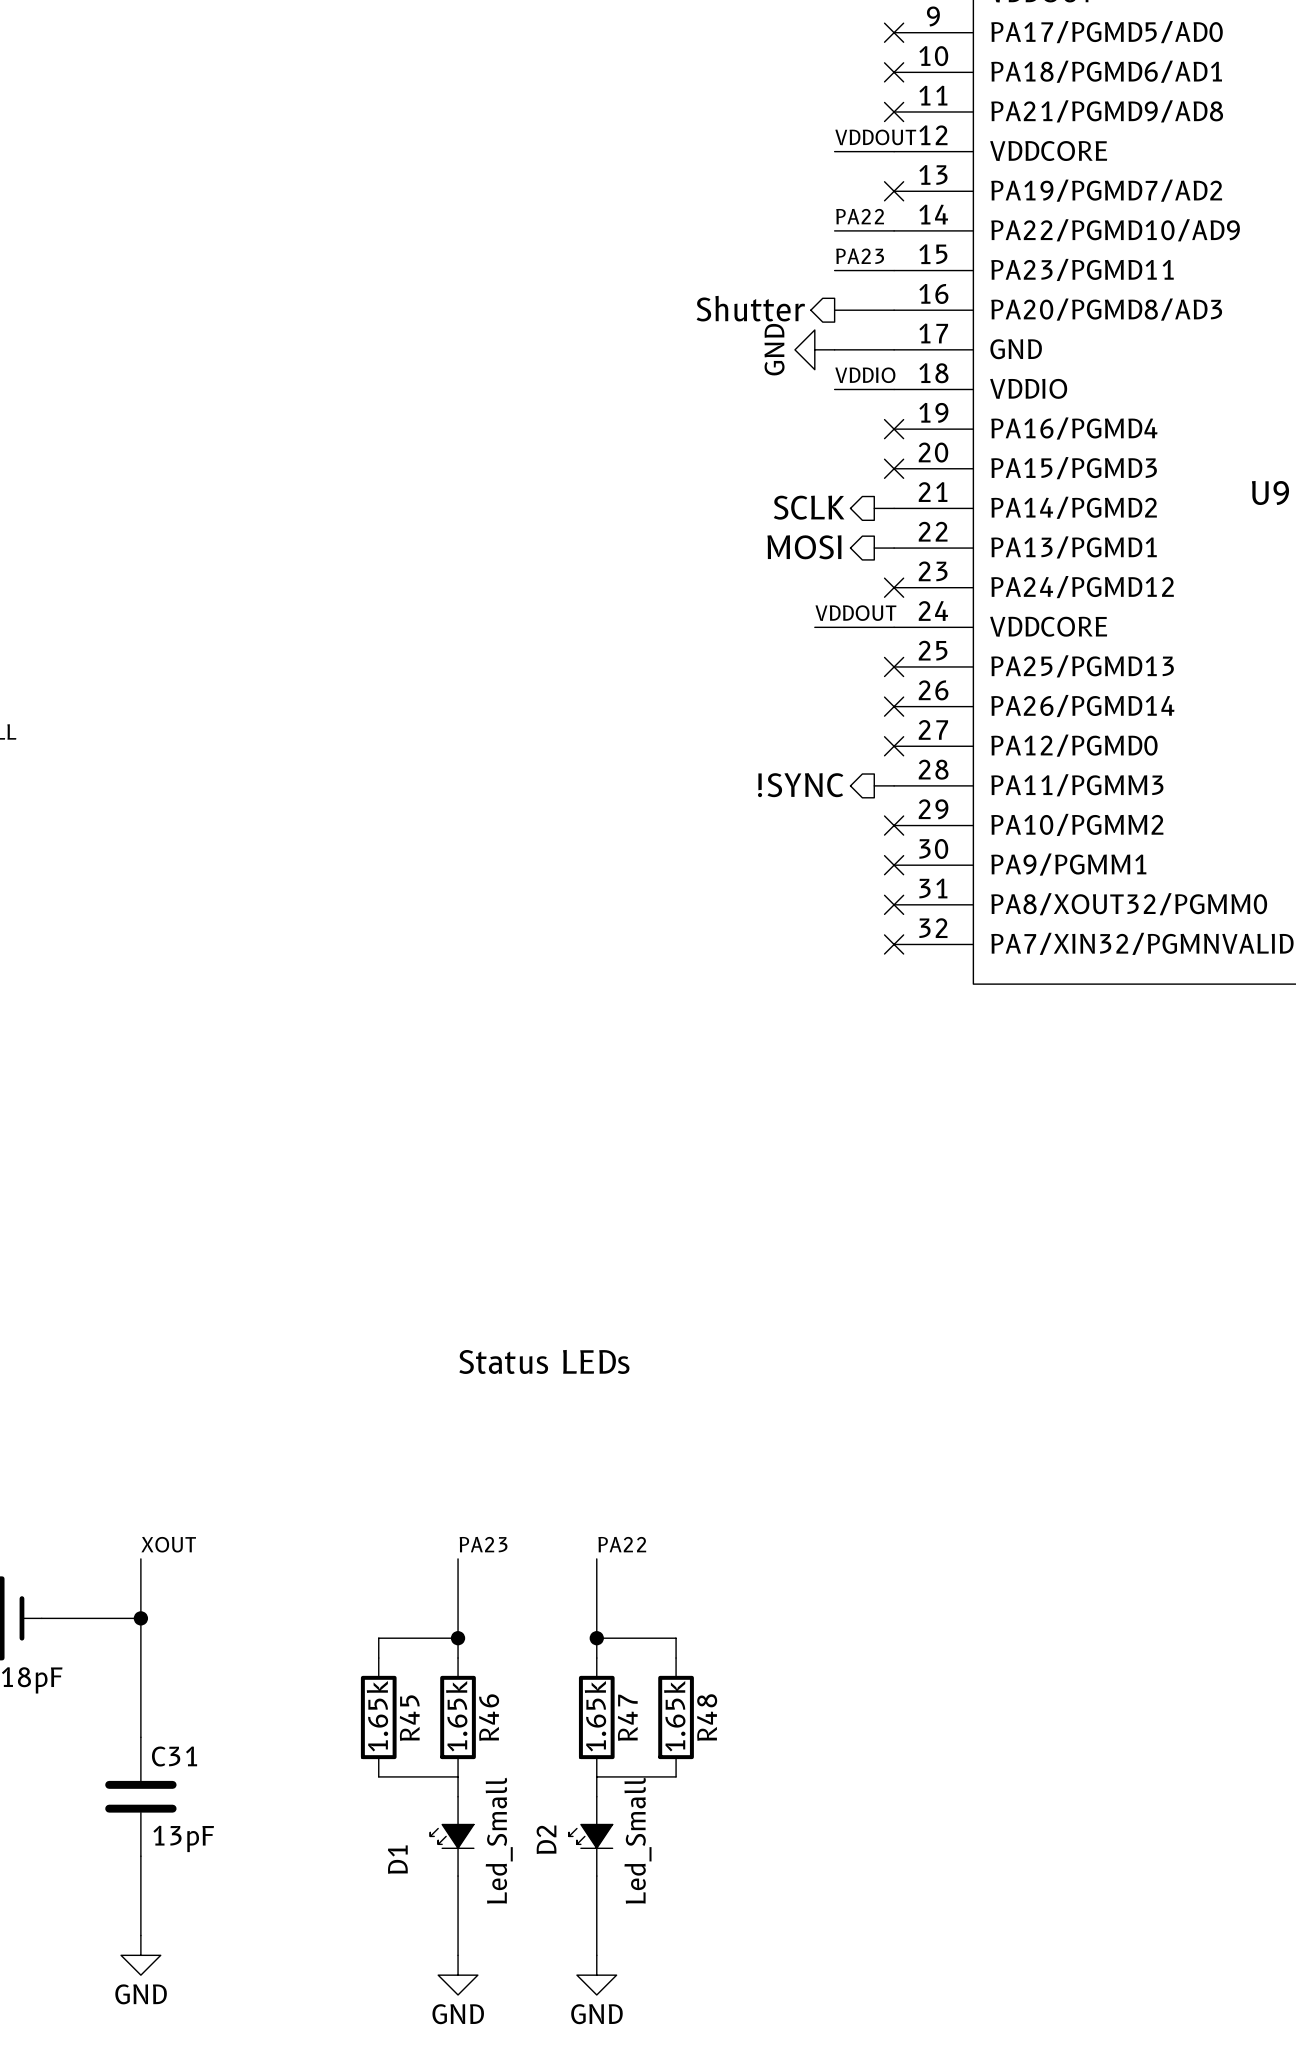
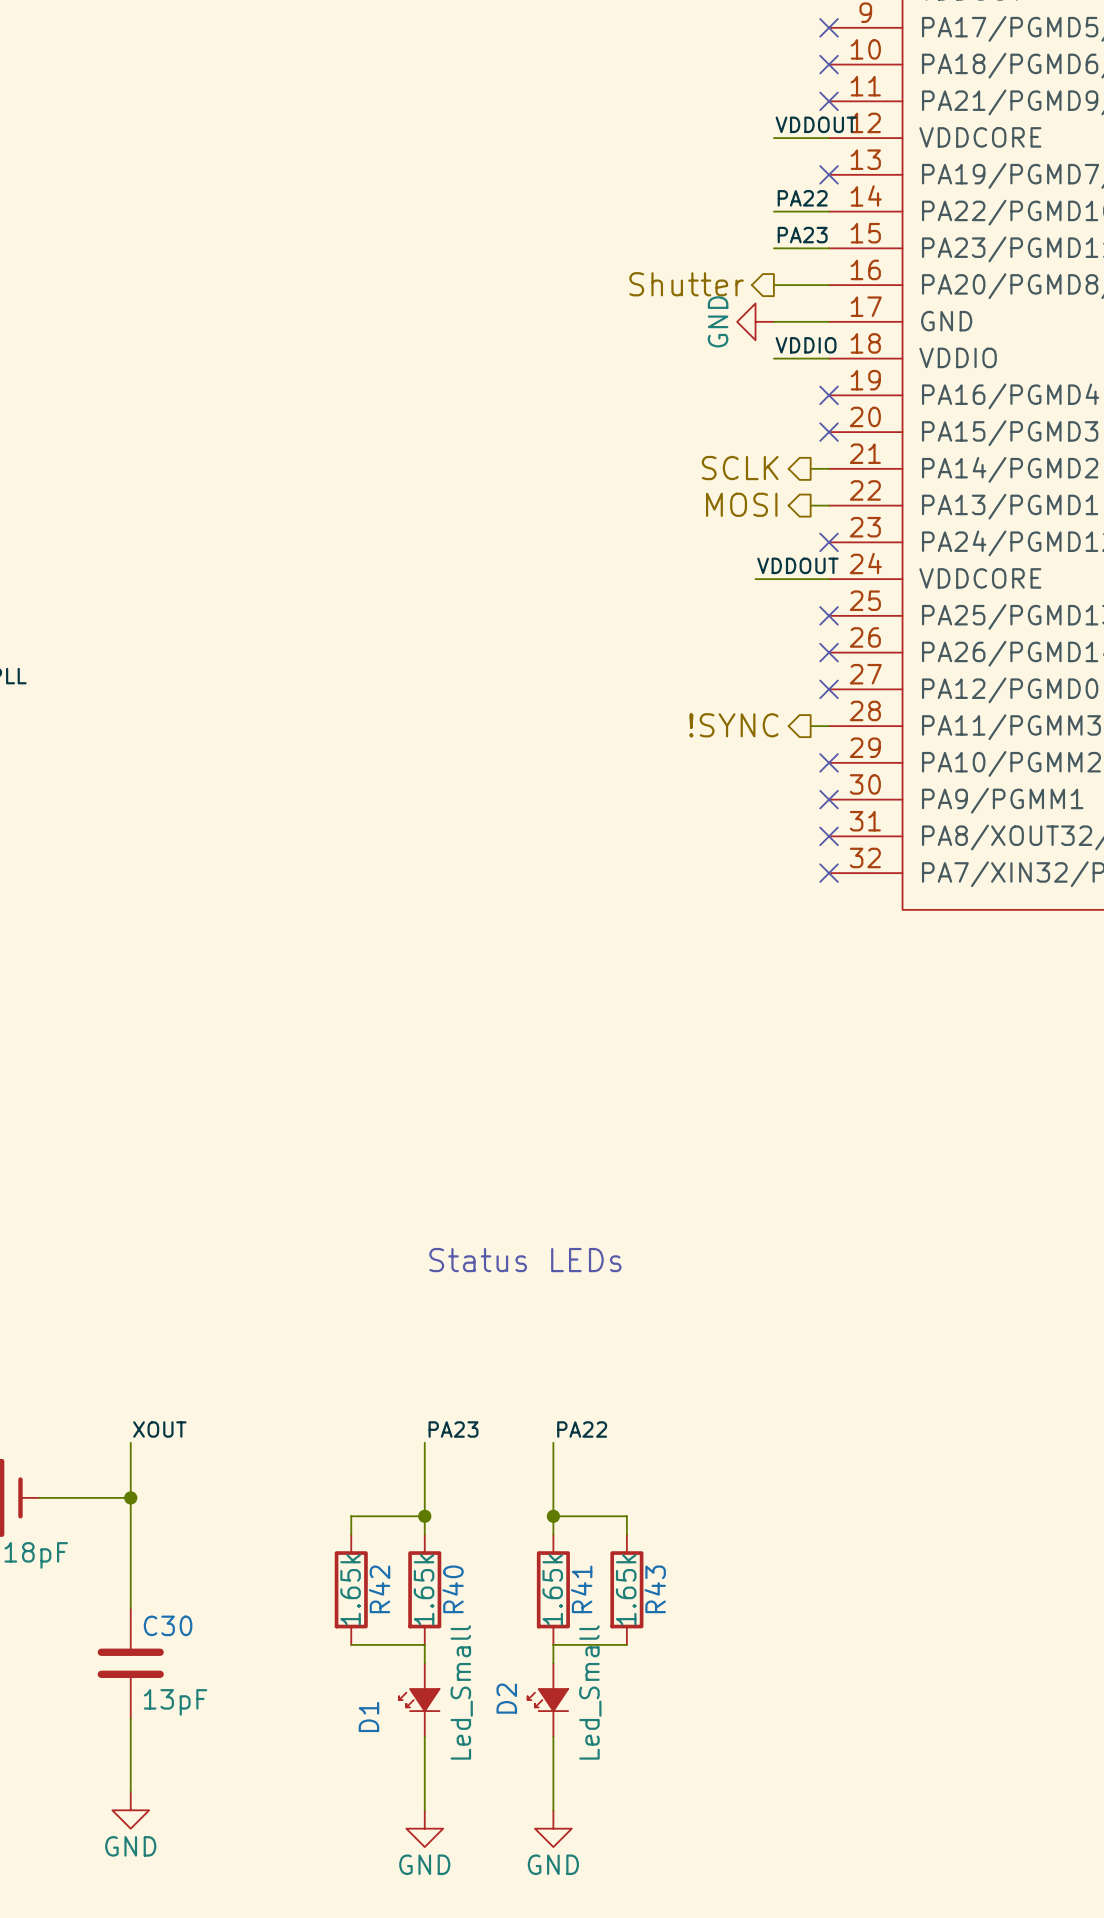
R46 name: R46 (489, 1717) -> R40 (453, 1589)
R47 name: R47 (627, 1717) -> R41 (581, 1589)
R48 name: R48 (707, 1717) -> R43 (655, 1589)
R45 name: R45 (409, 1718) -> R42 (379, 1589)
C31 name: C31 (174, 1756) -> C30 (168, 1625)

